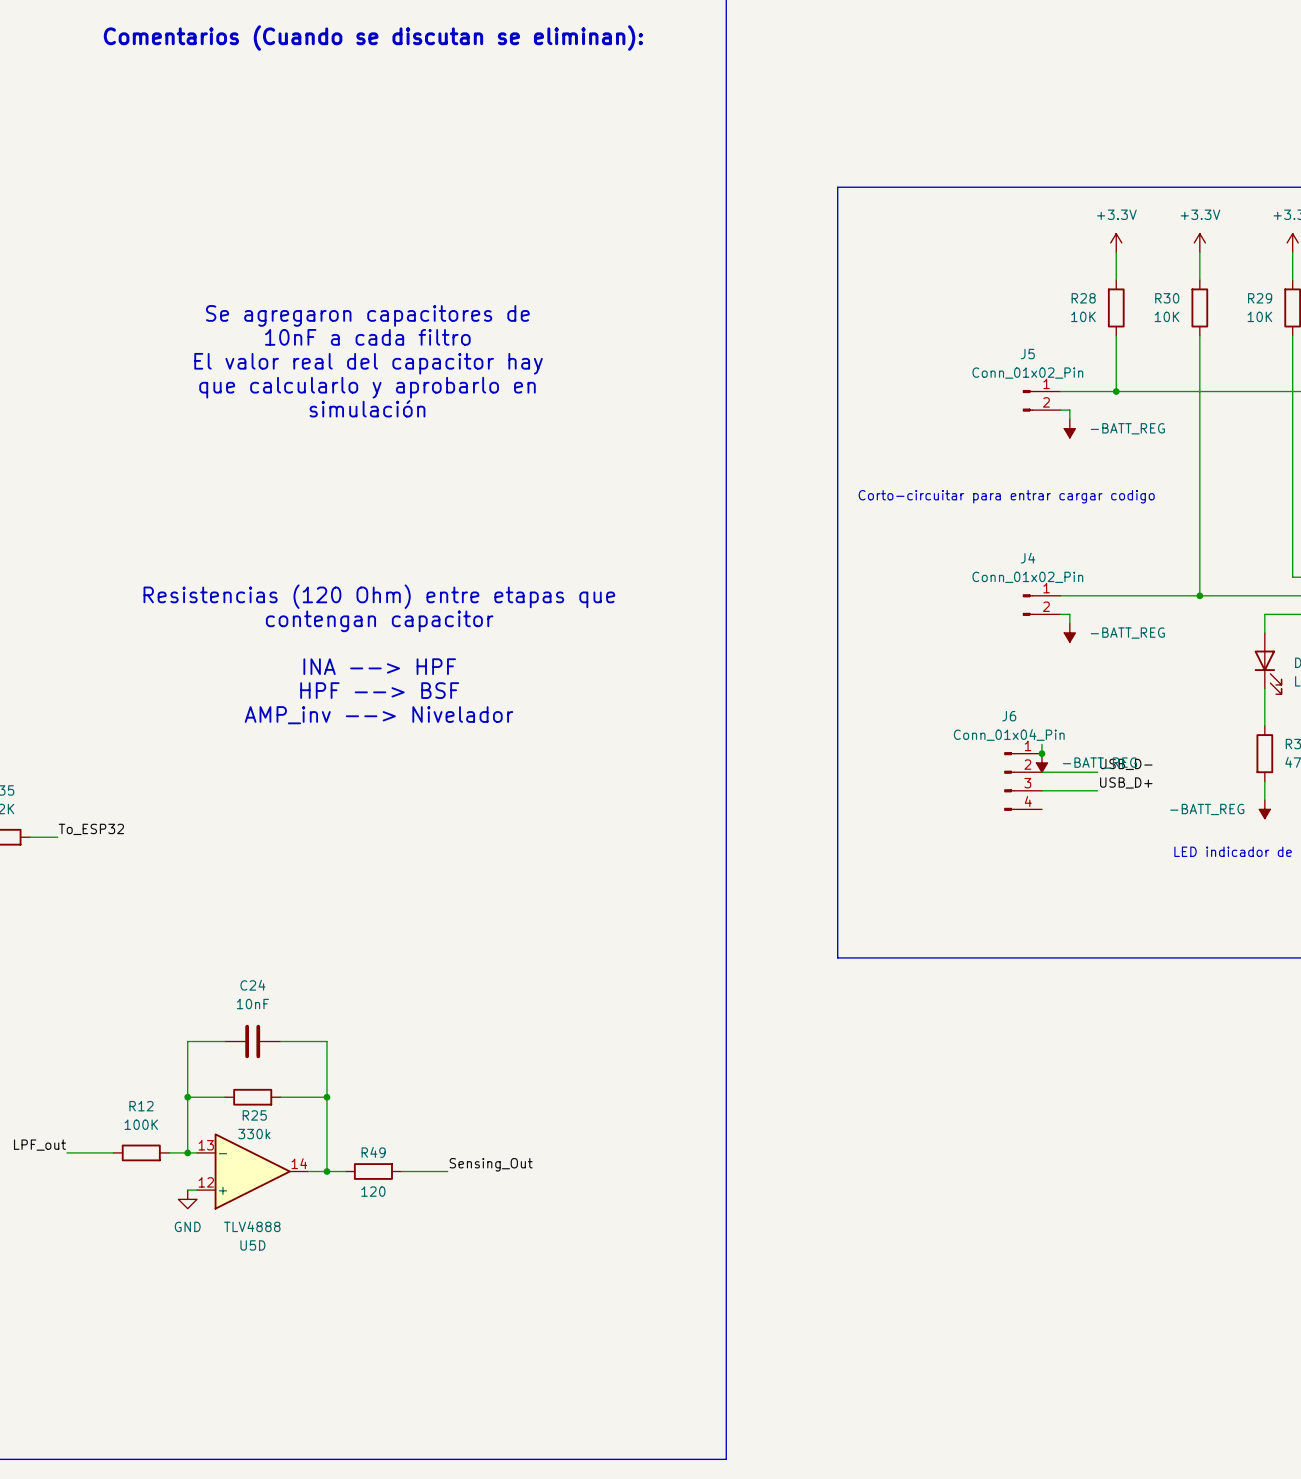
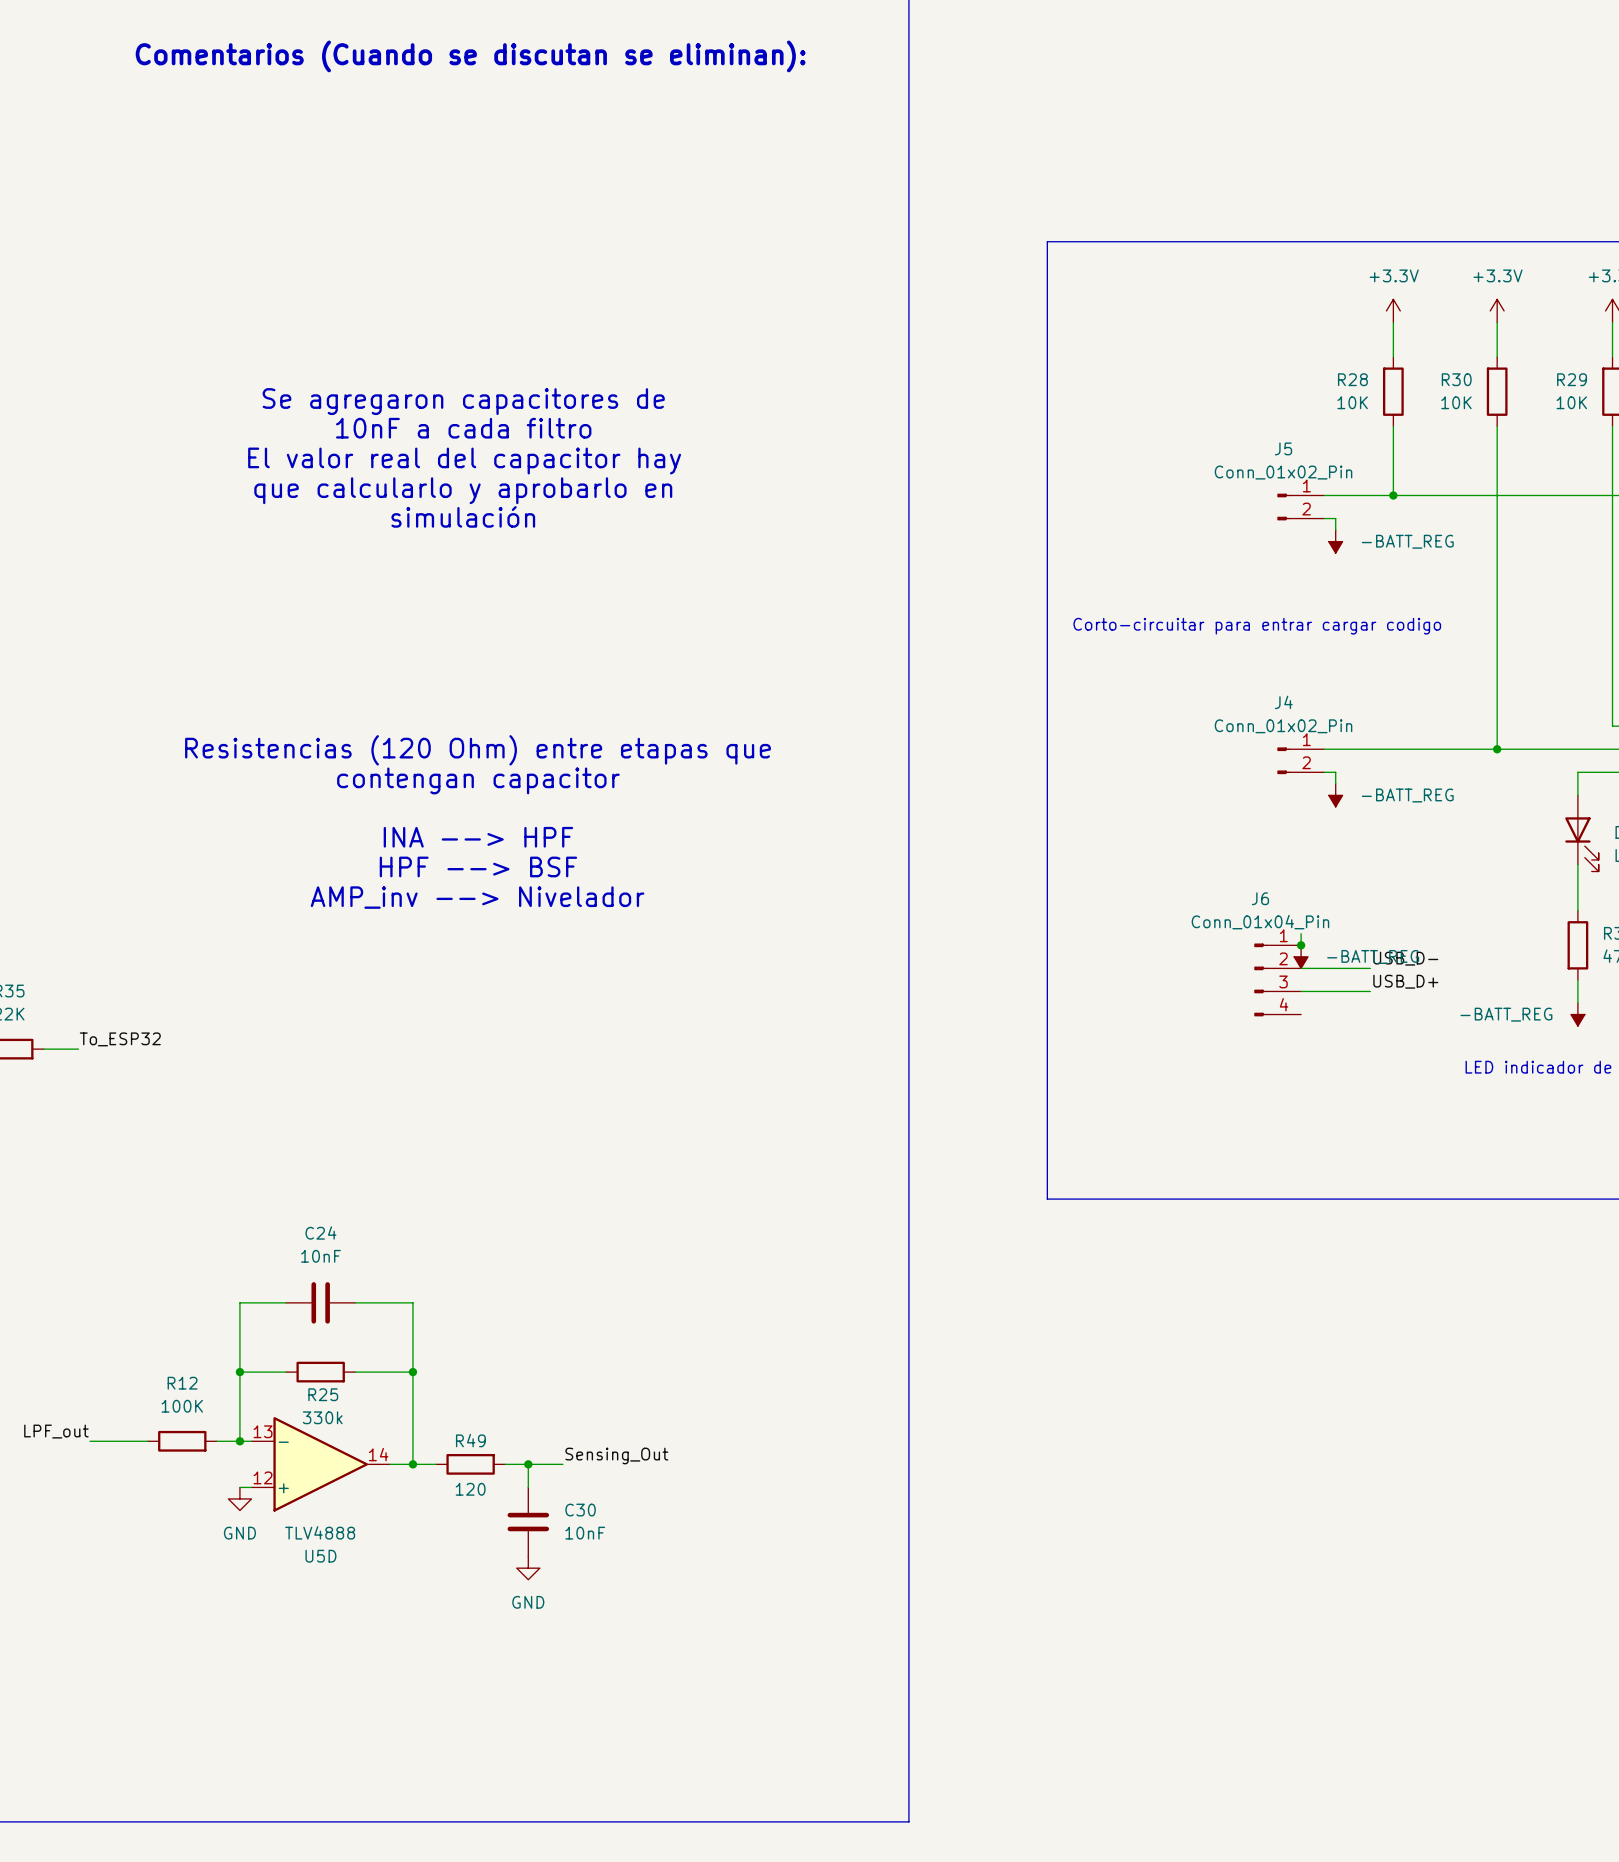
wire: none -> (528, 1464) (528, 1487)
junction: none -> (528, 1464)
C30: none -> 10nF (528, 1522)
power symbol: none -> GND (528, 1568)

